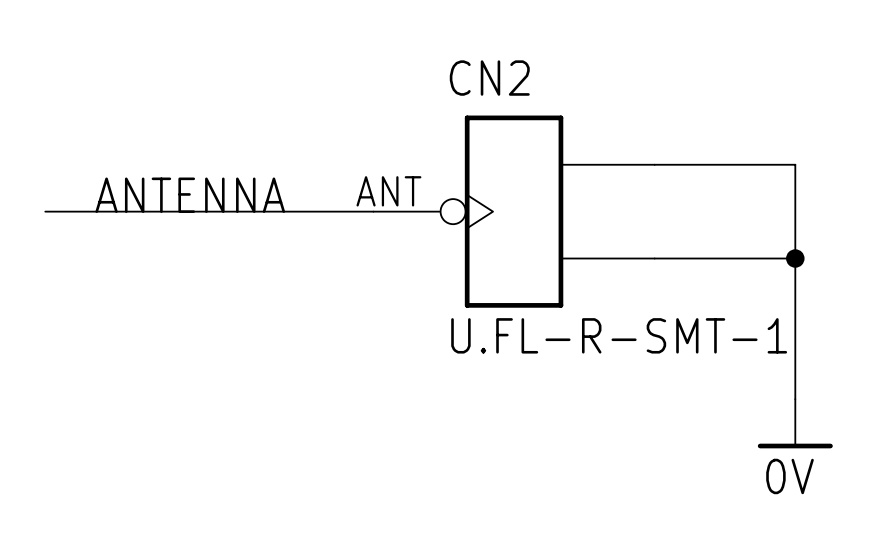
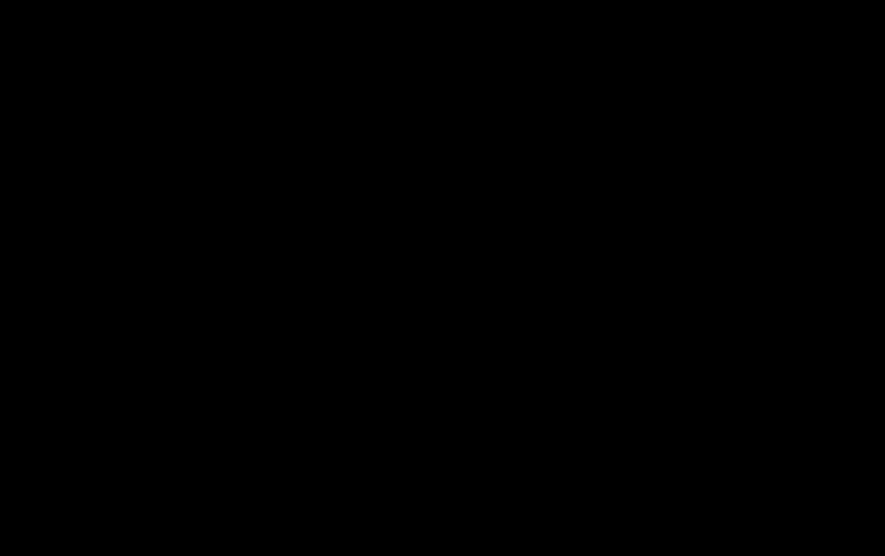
wire: (654, 164) (795, 164) (795, 399) -> none
label: ANTENNA (190, 195) -> none
wire: (45, 211) (373, 211) -> none
CN2: U.FL-R-SMT-1 (514, 211) -> none
wire: (654, 258) (795, 258) -> none
junction: (795, 258) -> none
power symbol: 0V (795, 423) -> none

